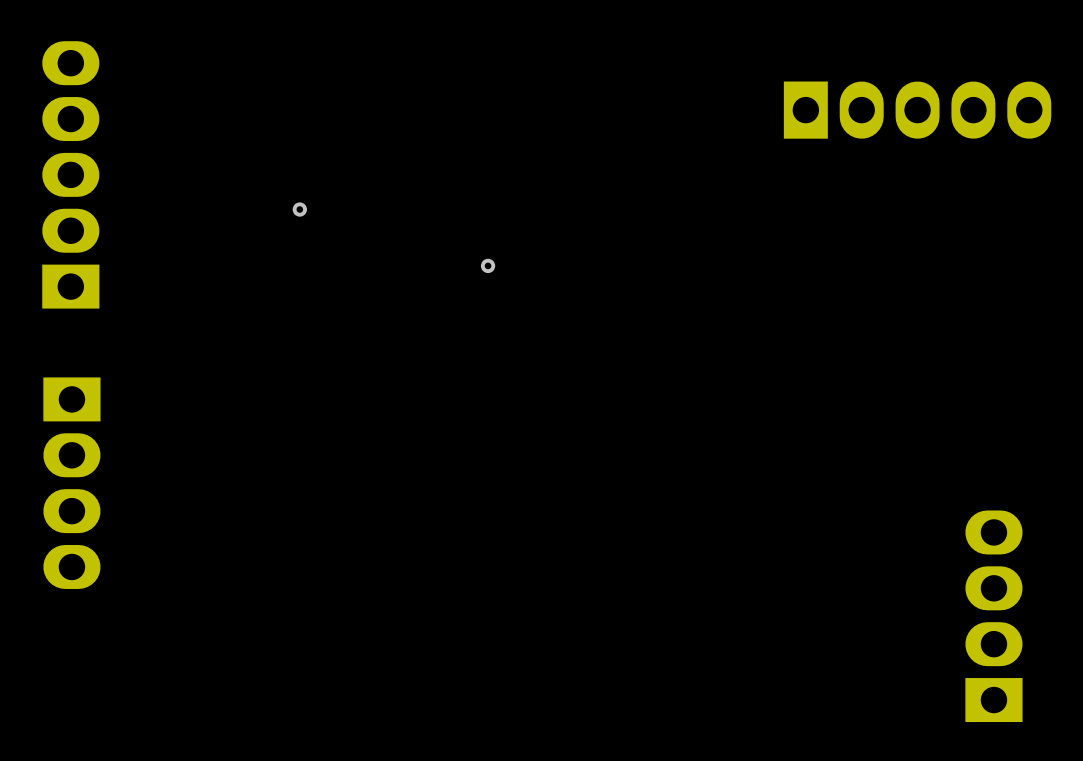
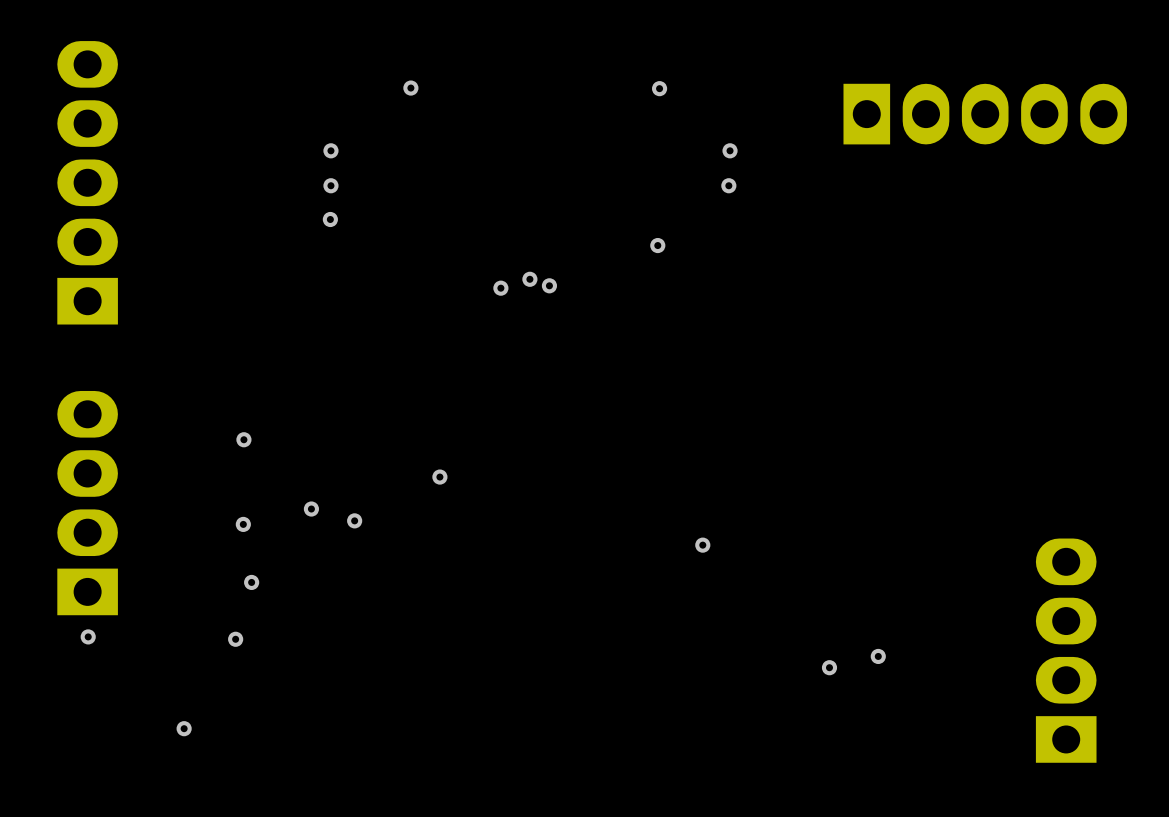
via: none -> (410, 88)
via: none -> (659, 88)
via: none -> (330, 150)
via: none -> (730, 150)
via: none -> (330, 185)
via: none -> (728, 185)
via: none -> (657, 245)
via: none -> (549, 285)
via: none -> (500, 288)
via: none -> (243, 439)
via: none -> (439, 477)
via: none -> (311, 509)
part rotation: 0° (71, 483) -> 180° (87, 503)
via: none -> (354, 520)
via: none -> (243, 524)
via: none -> (702, 545)
via: none -> (251, 582)
via: none -> (88, 636)
via: none -> (235, 639)
via: none -> (878, 656)
via: none -> (829, 667)
via: none -> (184, 728)

